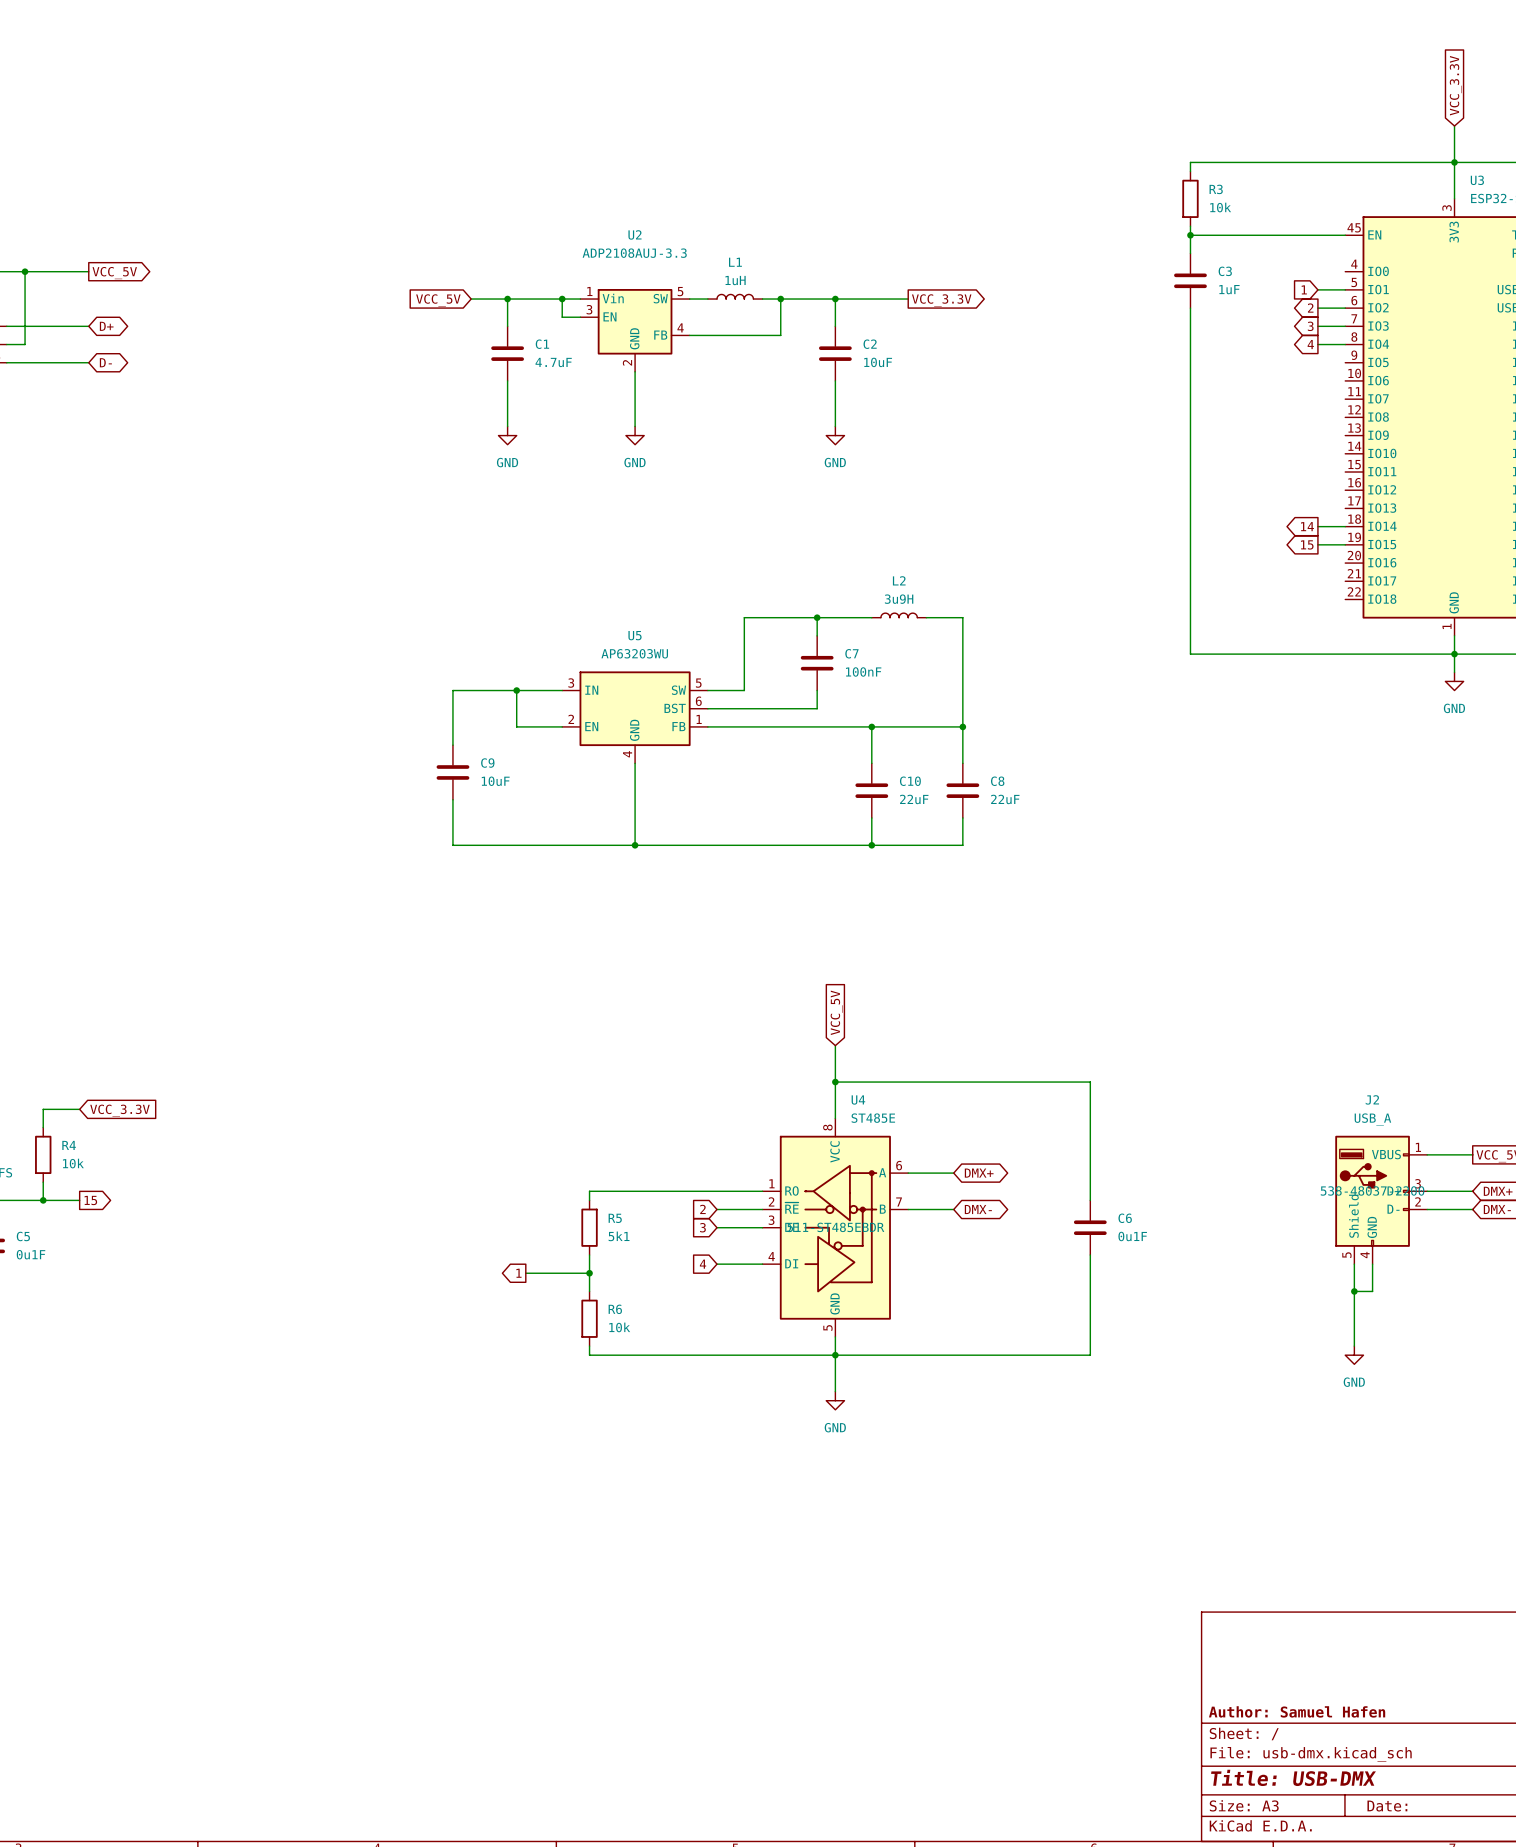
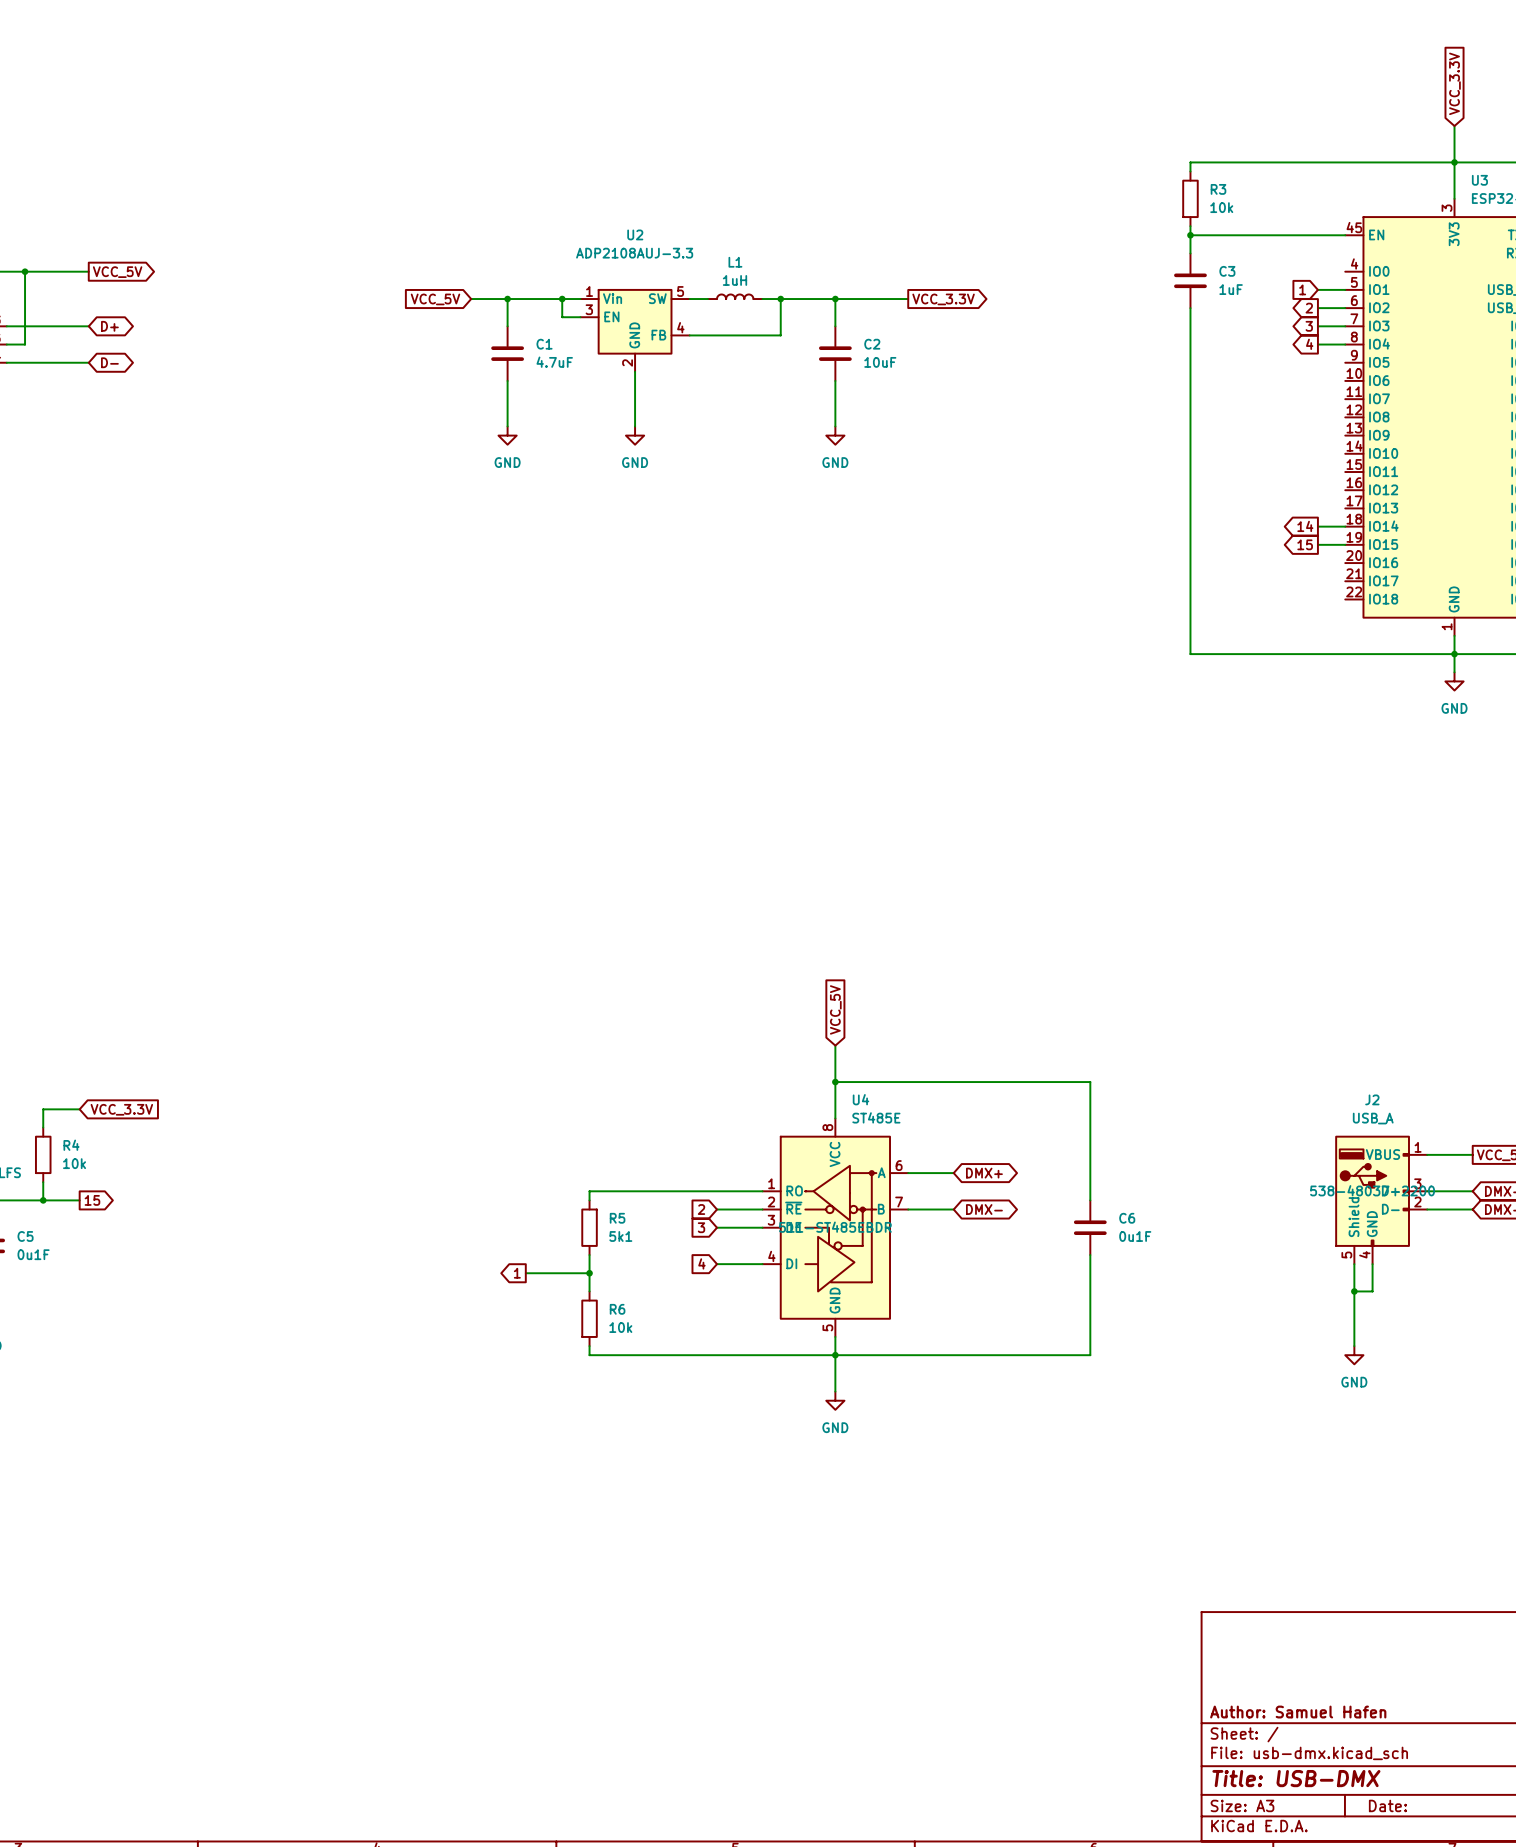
L2: 3u9H (899, 615) -> none
wire: (817, 617) (817, 635) -> none
junction: (817, 617) -> none
wire: (871, 617) (744, 617) (744, 690) (707, 690) -> none
wire: (926, 617) (962, 617) (962, 763) -> none
C7: 100nF (817, 663) -> none
wire: (516, 690) (516, 726) (562, 726) -> none
junction: (516, 690) -> none
wire: (562, 690) (452, 690) (452, 745) -> none
wire: (817, 690) (817, 708) (707, 708) -> none
U5: AP63203WU (635, 717) -> none
wire: (707, 726) (962, 726) -> none
wire: (871, 726) (871, 763) -> none
junction: (871, 726) -> none
junction: (962, 726) -> none
wire: (635, 763) (635, 845) -> none
C9: 10uF (452, 772) -> none
C10: 22uF (871, 790) -> none
C8: 22uF (962, 790) -> none
wire: (452, 799) (452, 845) (962, 845) (962, 817) -> none
wire: (871, 817) (871, 845) -> none
junction: (635, 845) -> none
junction: (871, 845) -> none

